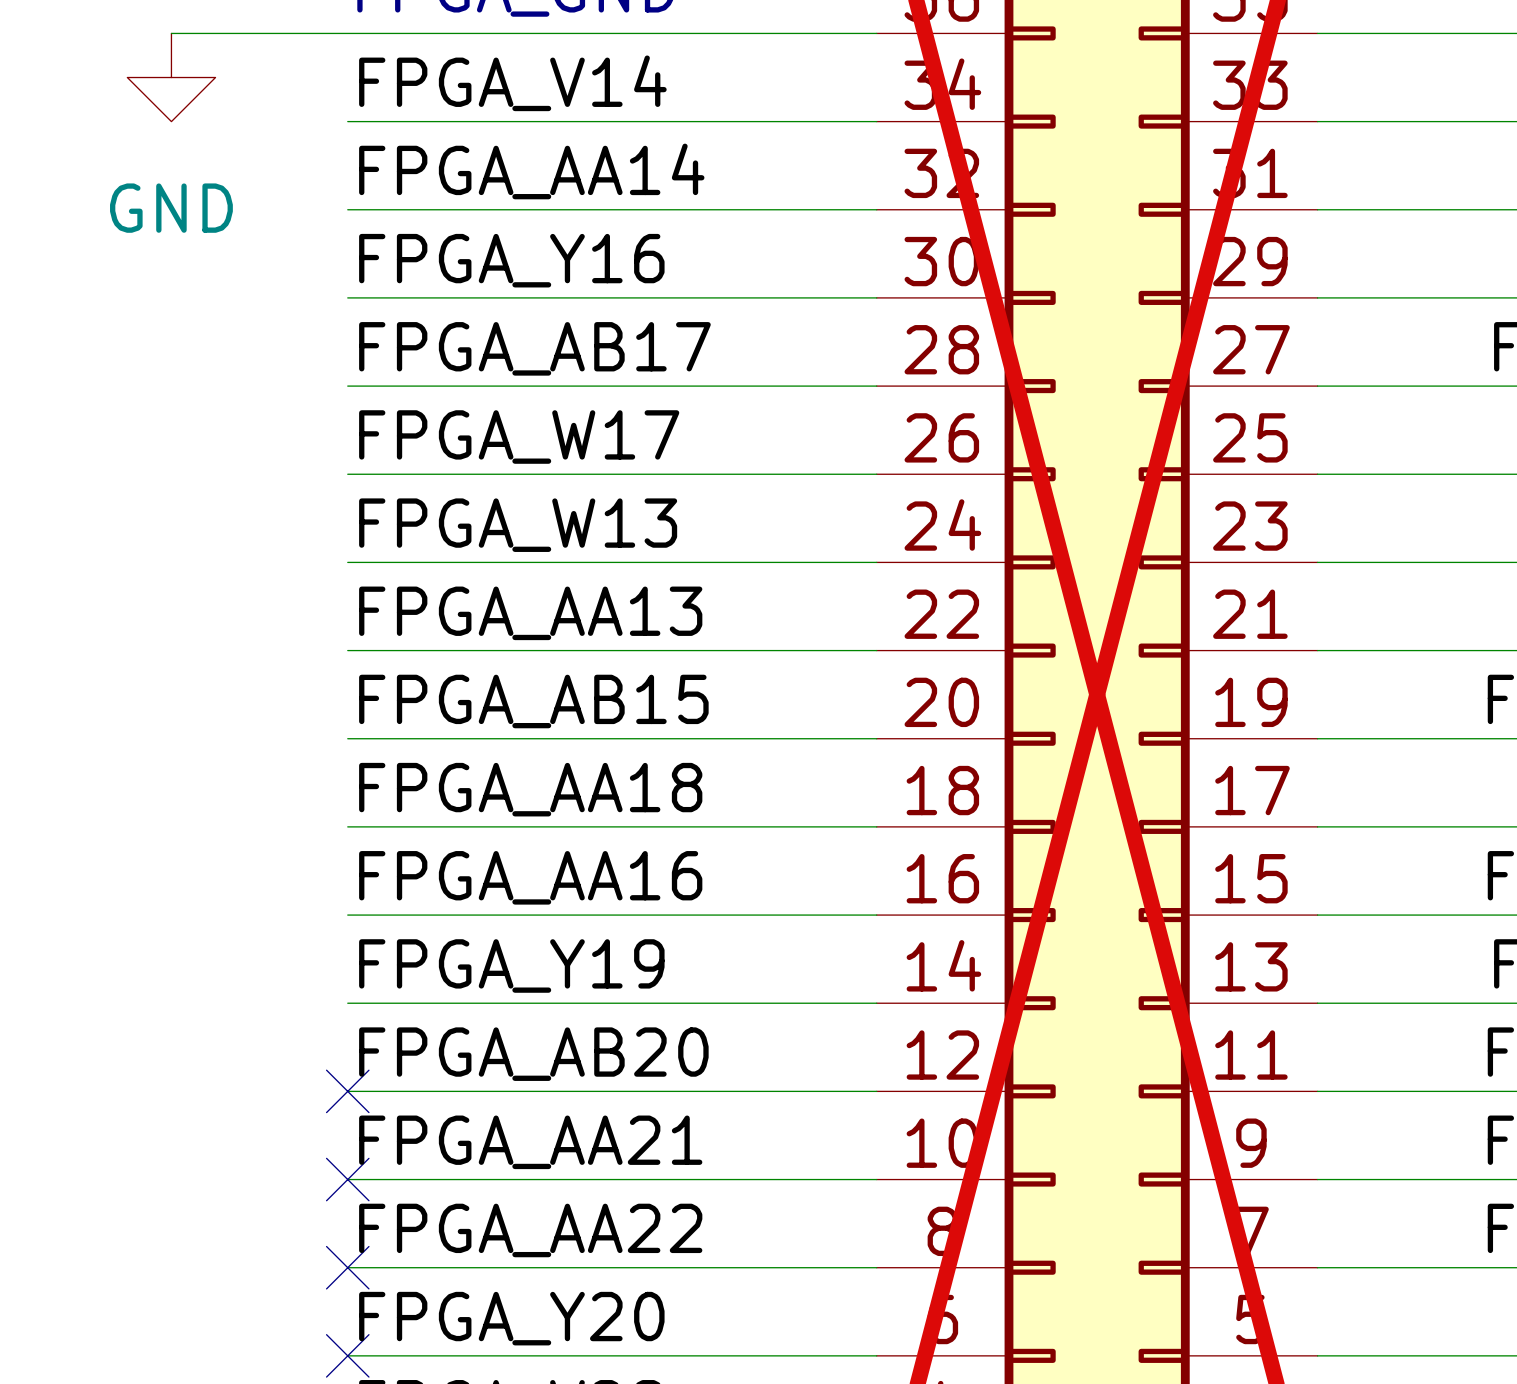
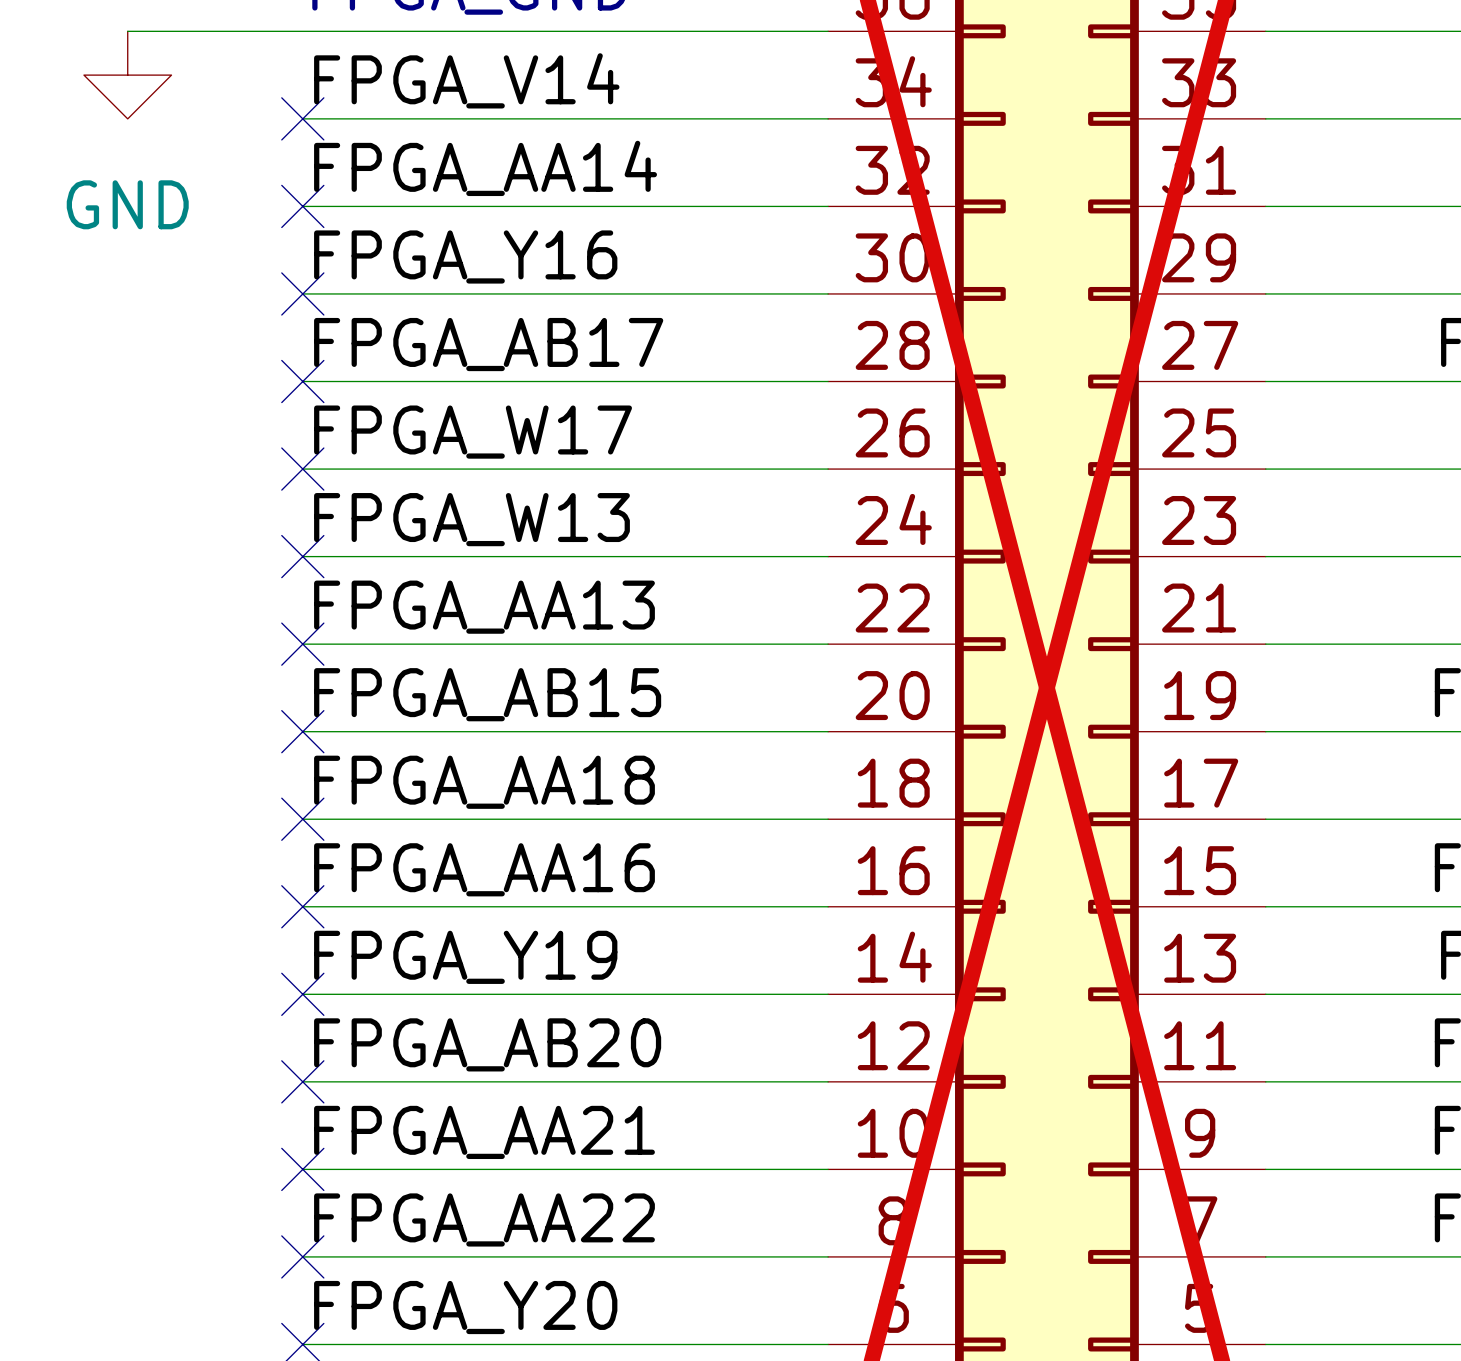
no-connect mark: none -> (302, 118)
no-connect mark: none -> (302, 206)
no-connect mark: none -> (302, 293)
no-connect mark: none -> (302, 381)
no-connect mark: none -> (302, 469)
no-connect mark: none -> (302, 556)
no-connect mark: none -> (302, 644)
no-connect mark: none -> (302, 731)
no-connect mark: none -> (302, 819)
no-connect mark: none -> (302, 906)
no-connect mark: none -> (302, 994)

